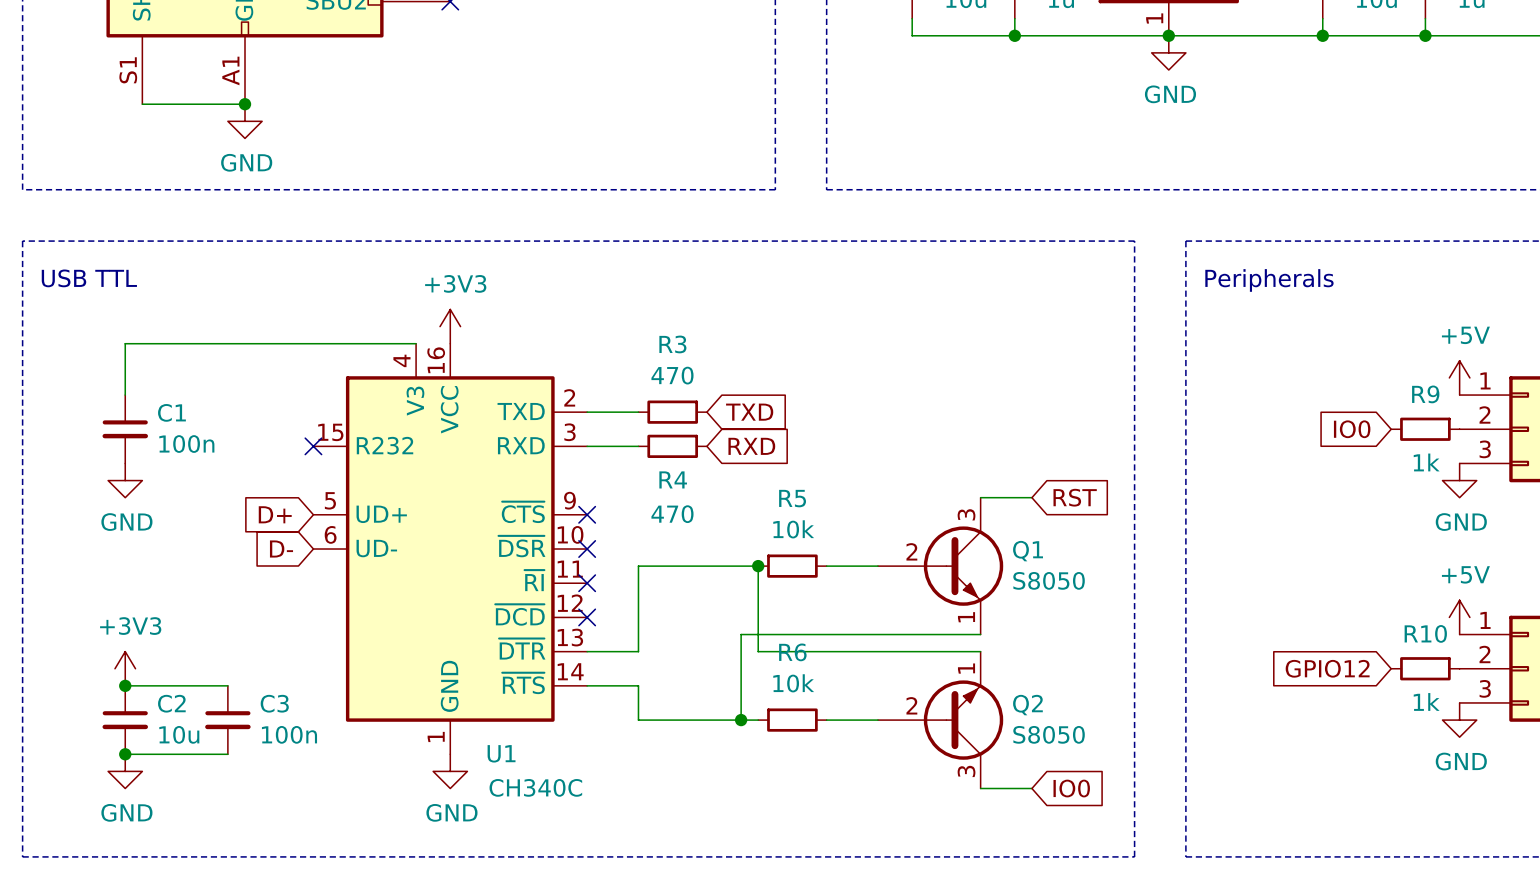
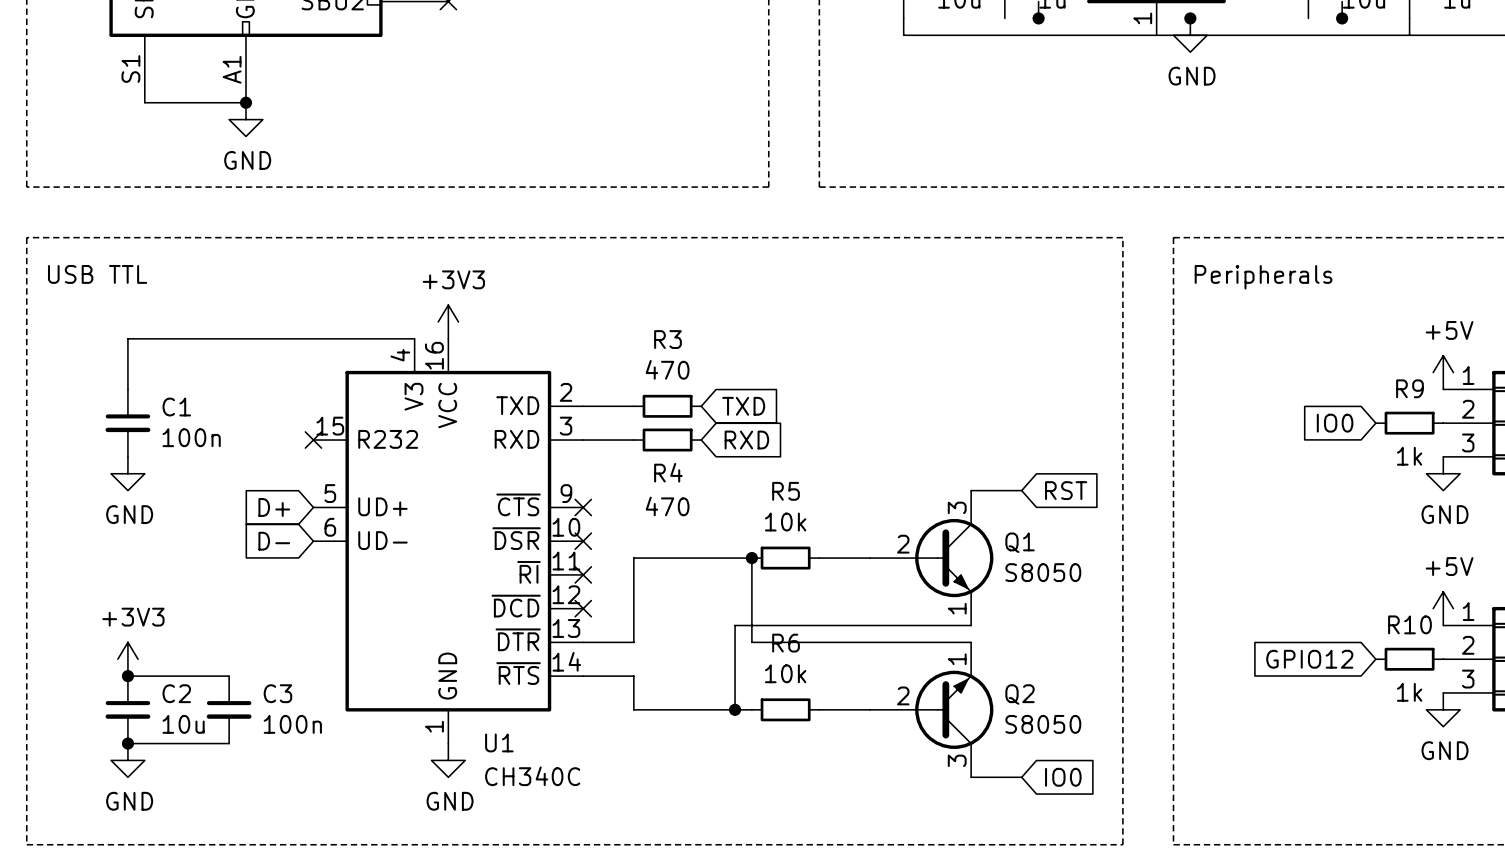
wire: (1014, 18) (1014, 35) -> (1038, 1) (1038, 18)
wire: (1322, 18) (1322, 35) -> (1342, 1) (1342, 18)
junction: none -> (1342, 18)
junction position: (1014, 35) -> (1038, 18)
junction position: (1168, 35) -> (1190, 18)
junction: (1322, 35) -> none
junction: (1425, 35) -> none
power symbol position: GND (1168, 52) -> GND (1190, 35)

